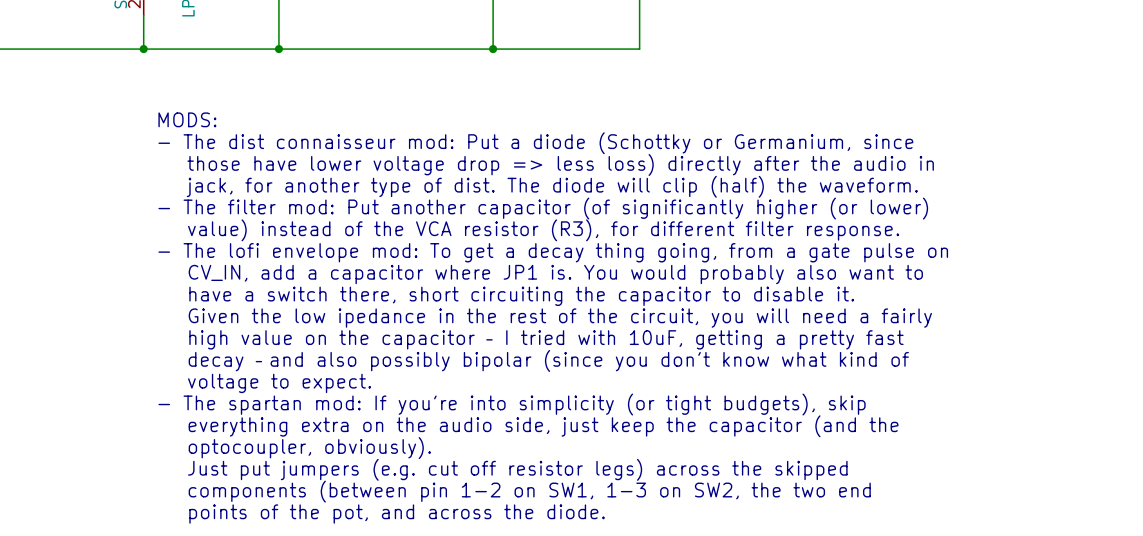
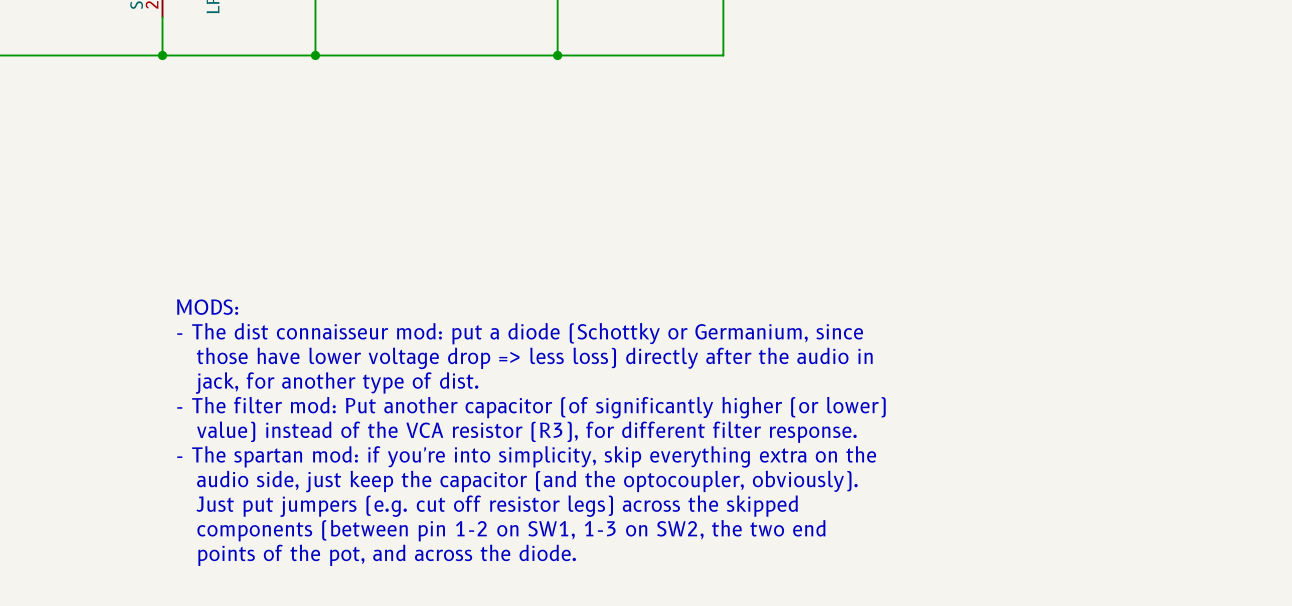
text: MODS: (187, 119) -> none
text: - The dist connaisseur mod: Put a diode (Schottky or Germanium, since (535, 143) -> none
text: those have lower voltage drop => less loss) directly after the audio in (560, 165) -> none
text: jack, for another type of dist. The diode will clip (half) the waveform. (552, 186) -> none
text: - The filter mod: Put another capacitor (of significantly higher (or lower) (543, 208) -> none
text: value) instead of the VCA resistor (R3), for different filter response. (543, 230) -> none
text: - The lofi envelope mod: To get a decay thing going, from a gate pulse on (553, 252) -> none
text: CV_IN, add a capacitor where JP1 is. You would probably also want to (555, 274) -> MODS: (207, 307)
text: have a switch there, short circuiting the capacitor to disable it. (521, 296) -> - The dist connaisseur mod: put a diode (Schottky or Germanium, since (520, 333)
text: Given the low ipedance in the rest of the circuit, you will need a fairly (560, 318) -> those have lower voltage drop => less loss) directly after the audio in (534, 358)
text: high value on the capacitor – I tried with 10uF, getting a pretty fast (546, 339) -> jack, for another type of dist. (337, 383)
text: decay – and also possibly bipolar (since you don't know what kind of (548, 360) -> - The filter mod: Put another capacitor (of significantly higher (or lower) (531, 407)
text: voltage to expect. (279, 383) -> value) instead of the VCA resistor (R3), for different filter response. (526, 432)
text: - The spartan mod: If you're into simplicity (or tight budgets), skip (512, 404) -> - The spartan mod: if you're into simplicity, skip everything extra on the (526, 456)
text: everything extra on the audio side, just keep the capacitor (and the (543, 426) -> audio side, just keep the capacitor (and the optocoupler, obviously). (527, 481)
text: optocoupler, obviously). (309, 448) -> Just put jumpers (e.g. cut off resistor legs) across the skipped (497, 506)
text: Just put jumpers (e.g. cut off resistor legs) across the skipped (517, 469) -> components (between pin 1-2 on SW1, 1-3 on SW2, the two end (511, 530)
text: components (between pin 1-2 on SW1, 1-3 on SW2, the two end (529, 491) -> points of the pot, and across the diode. (387, 555)
text: points of the pot, and across the diode. (397, 514) -> none

